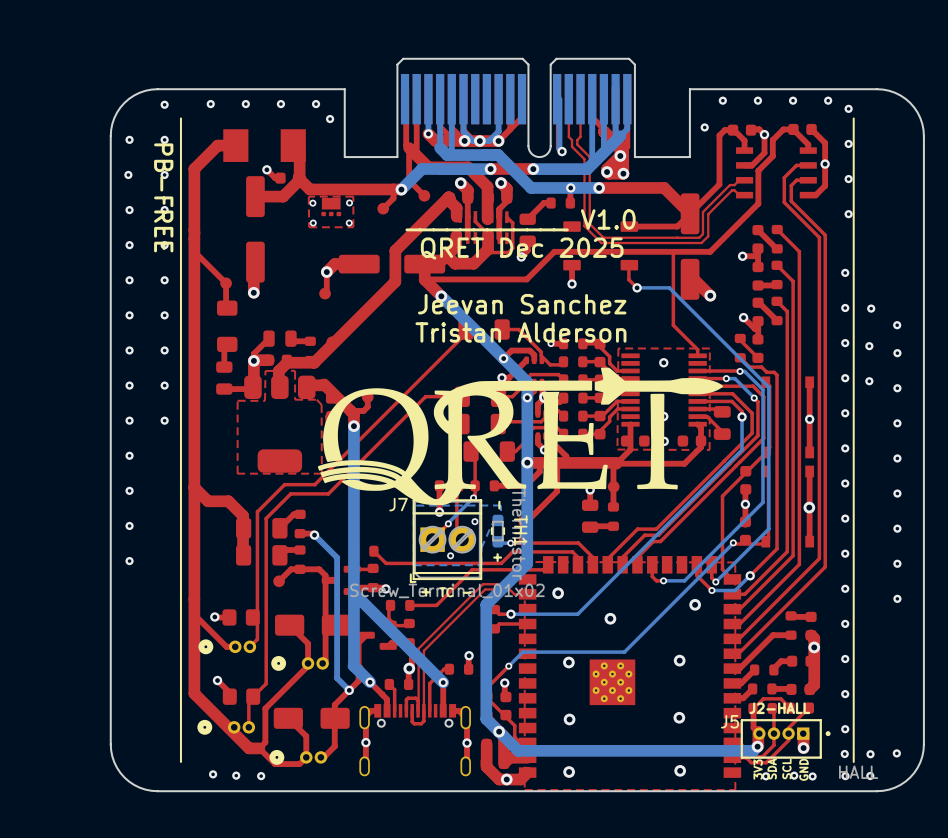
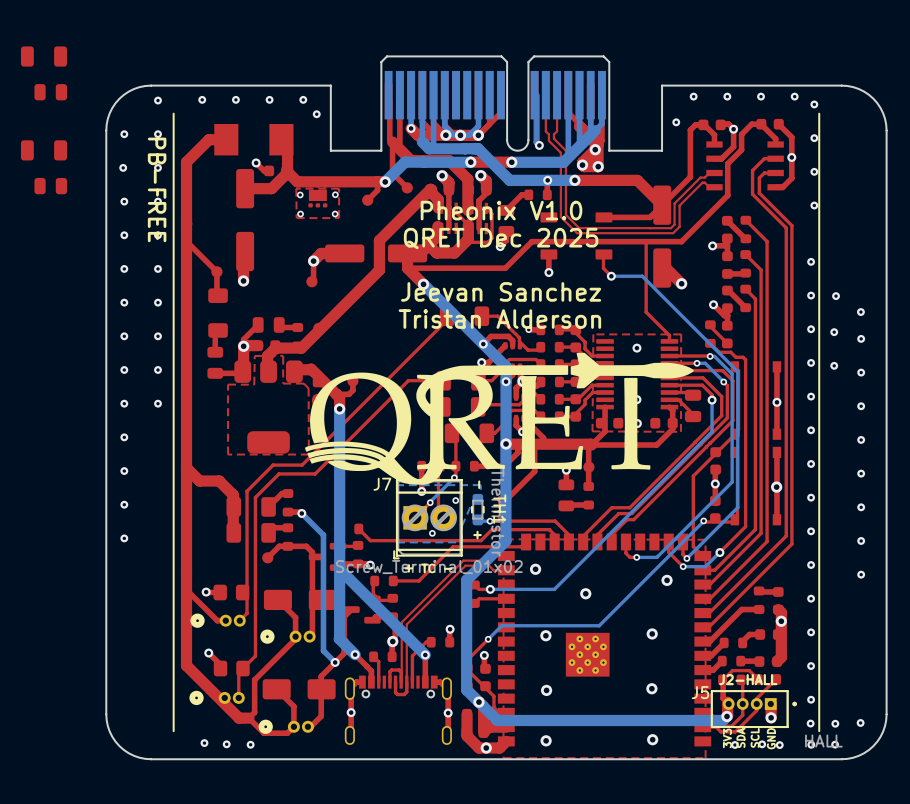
part: none -> (43, 56)
part: none -> (50, 92)
part: none -> (43, 150)
part: none -> (50, 186)
text: ____________ V1.0 (520, 220) -> Pheonix V1.0 (501, 210)

